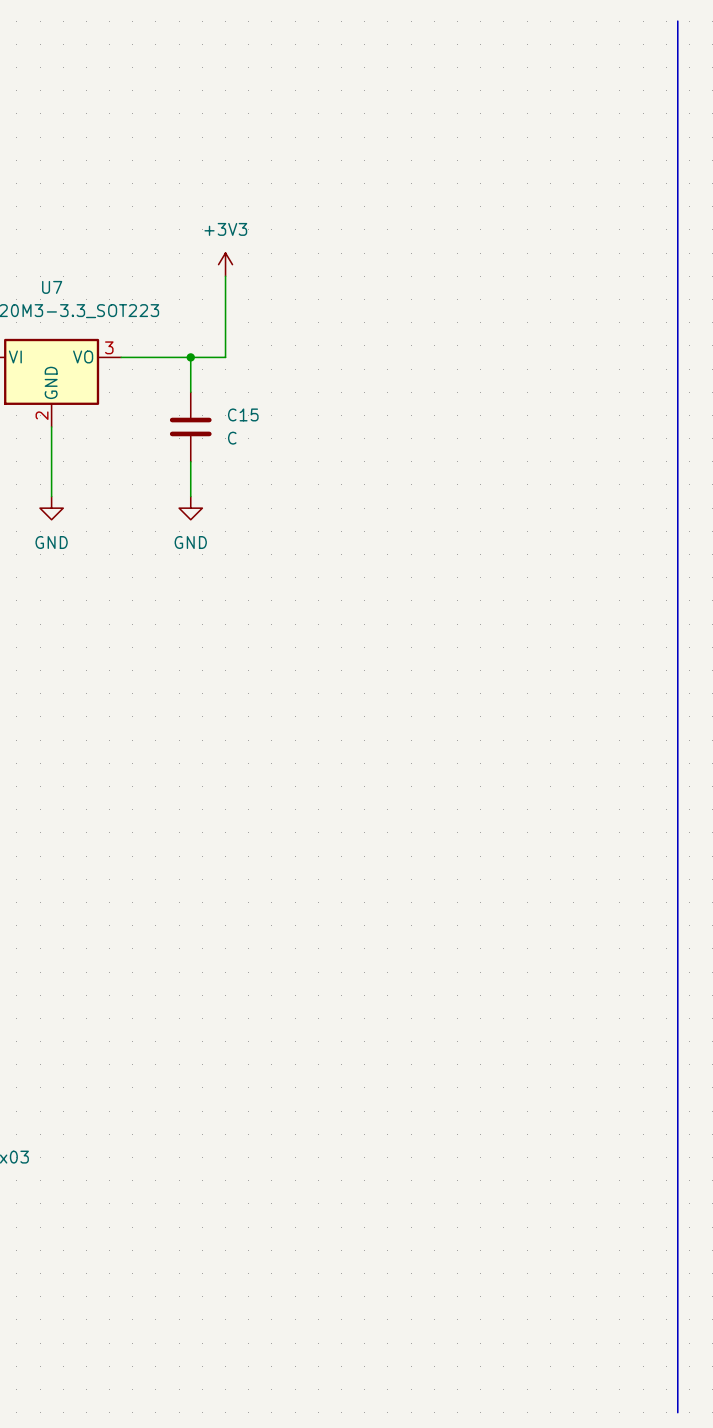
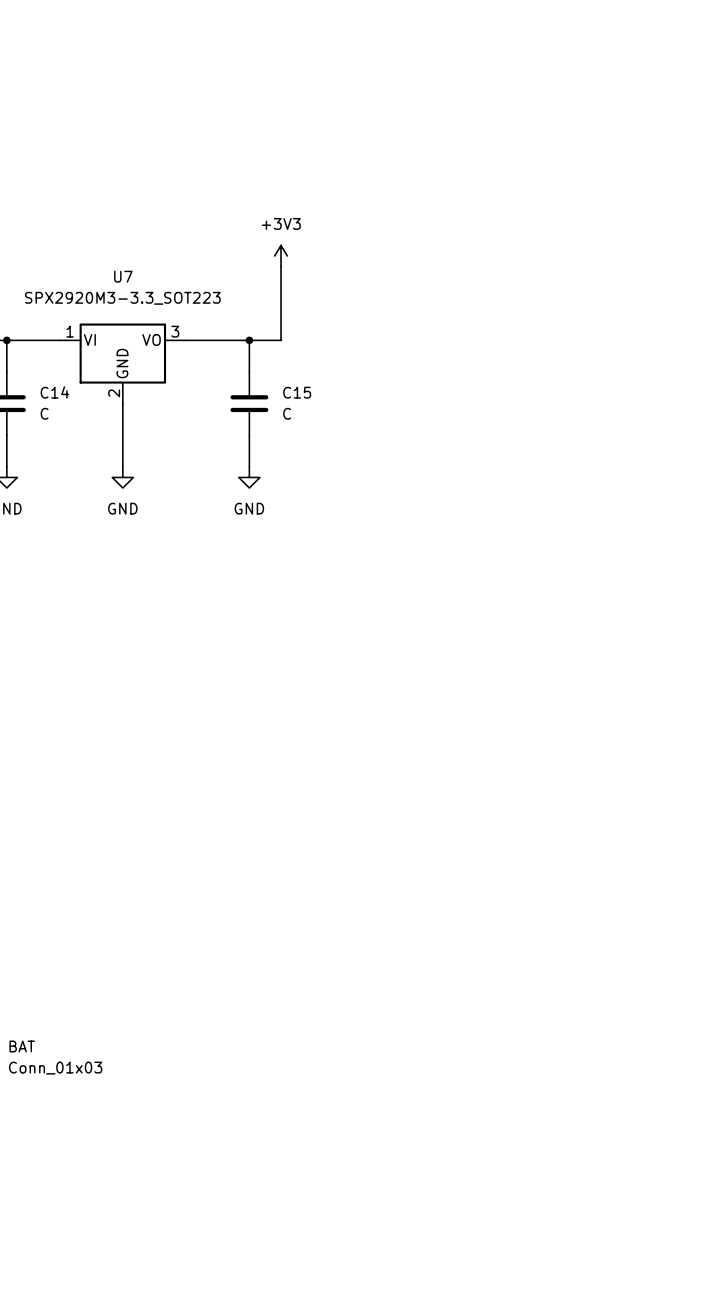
line: (677, 21) (677, 1412) -> none

